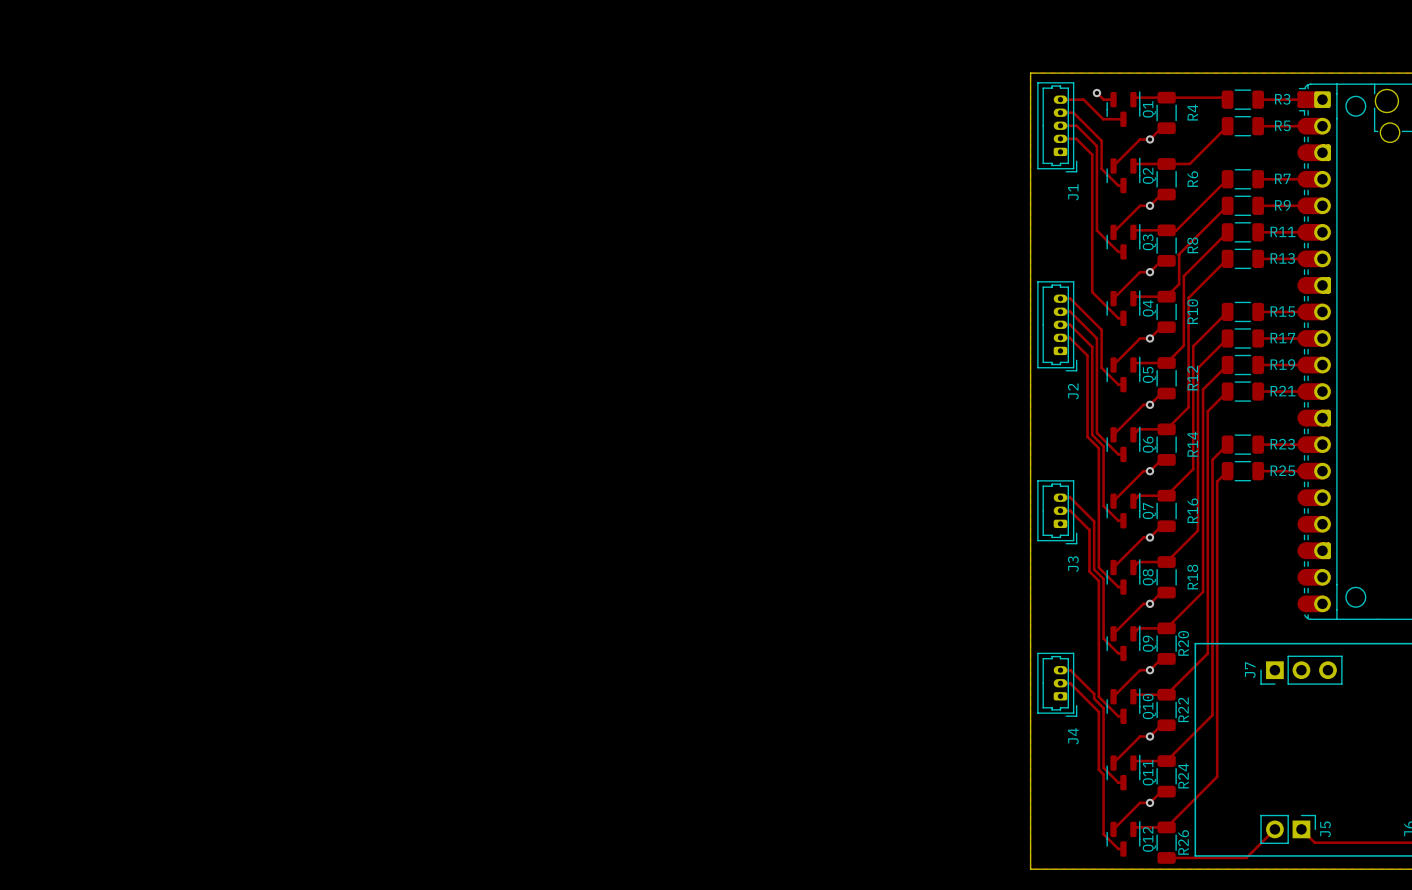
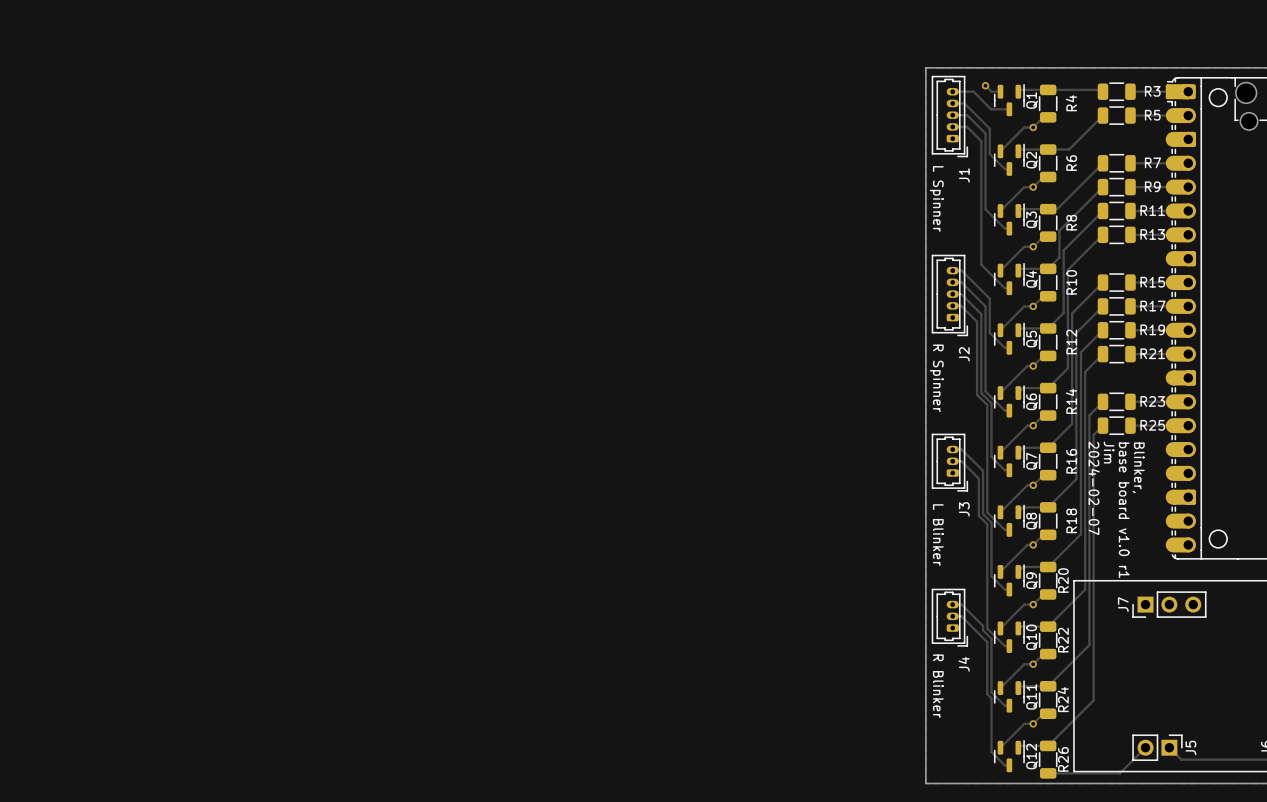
text: none -> L Spinner (936, 199)
text: none -> R Spinner (936, 378)
text: none -> Jim (1109, 452)
text: none -> Blinker, (1138, 467)
text: none -> 2024-02-07 (1094, 488)
text: none -> base board v1.0 r1 (1124, 510)
text: none -> L Blinker (938, 535)
text: none -> R Blinker (938, 686)

